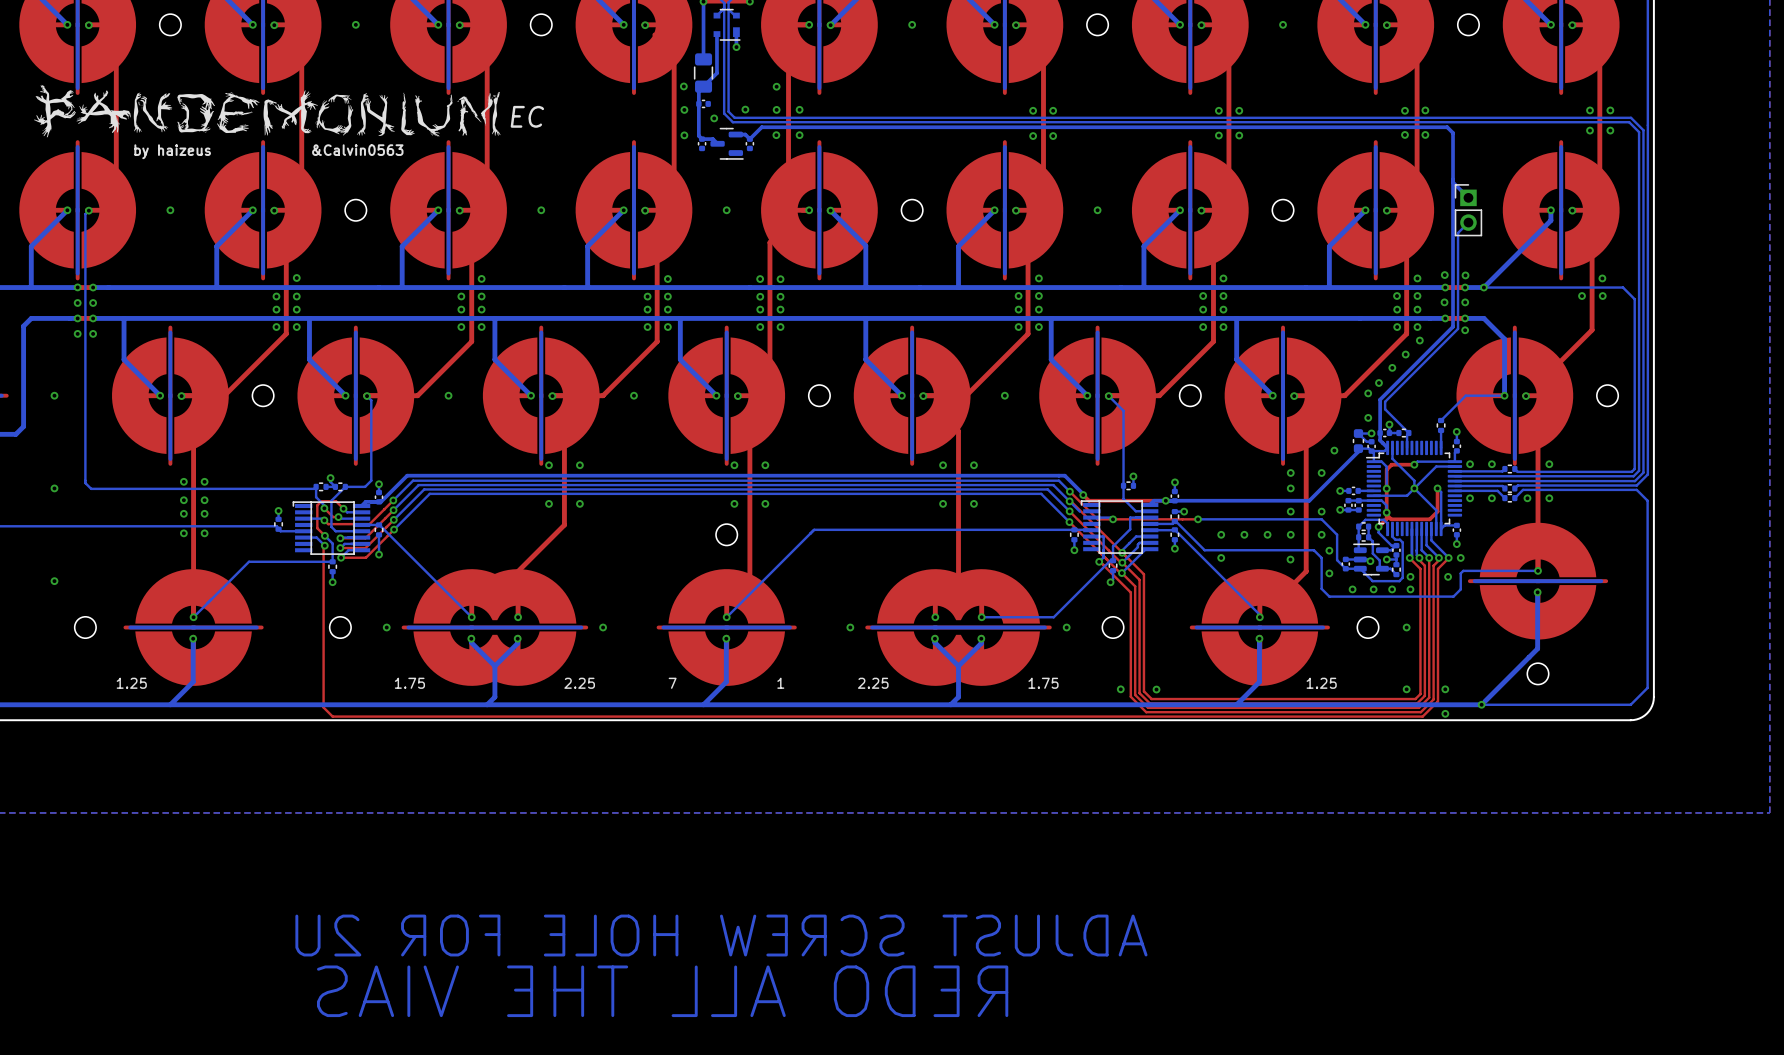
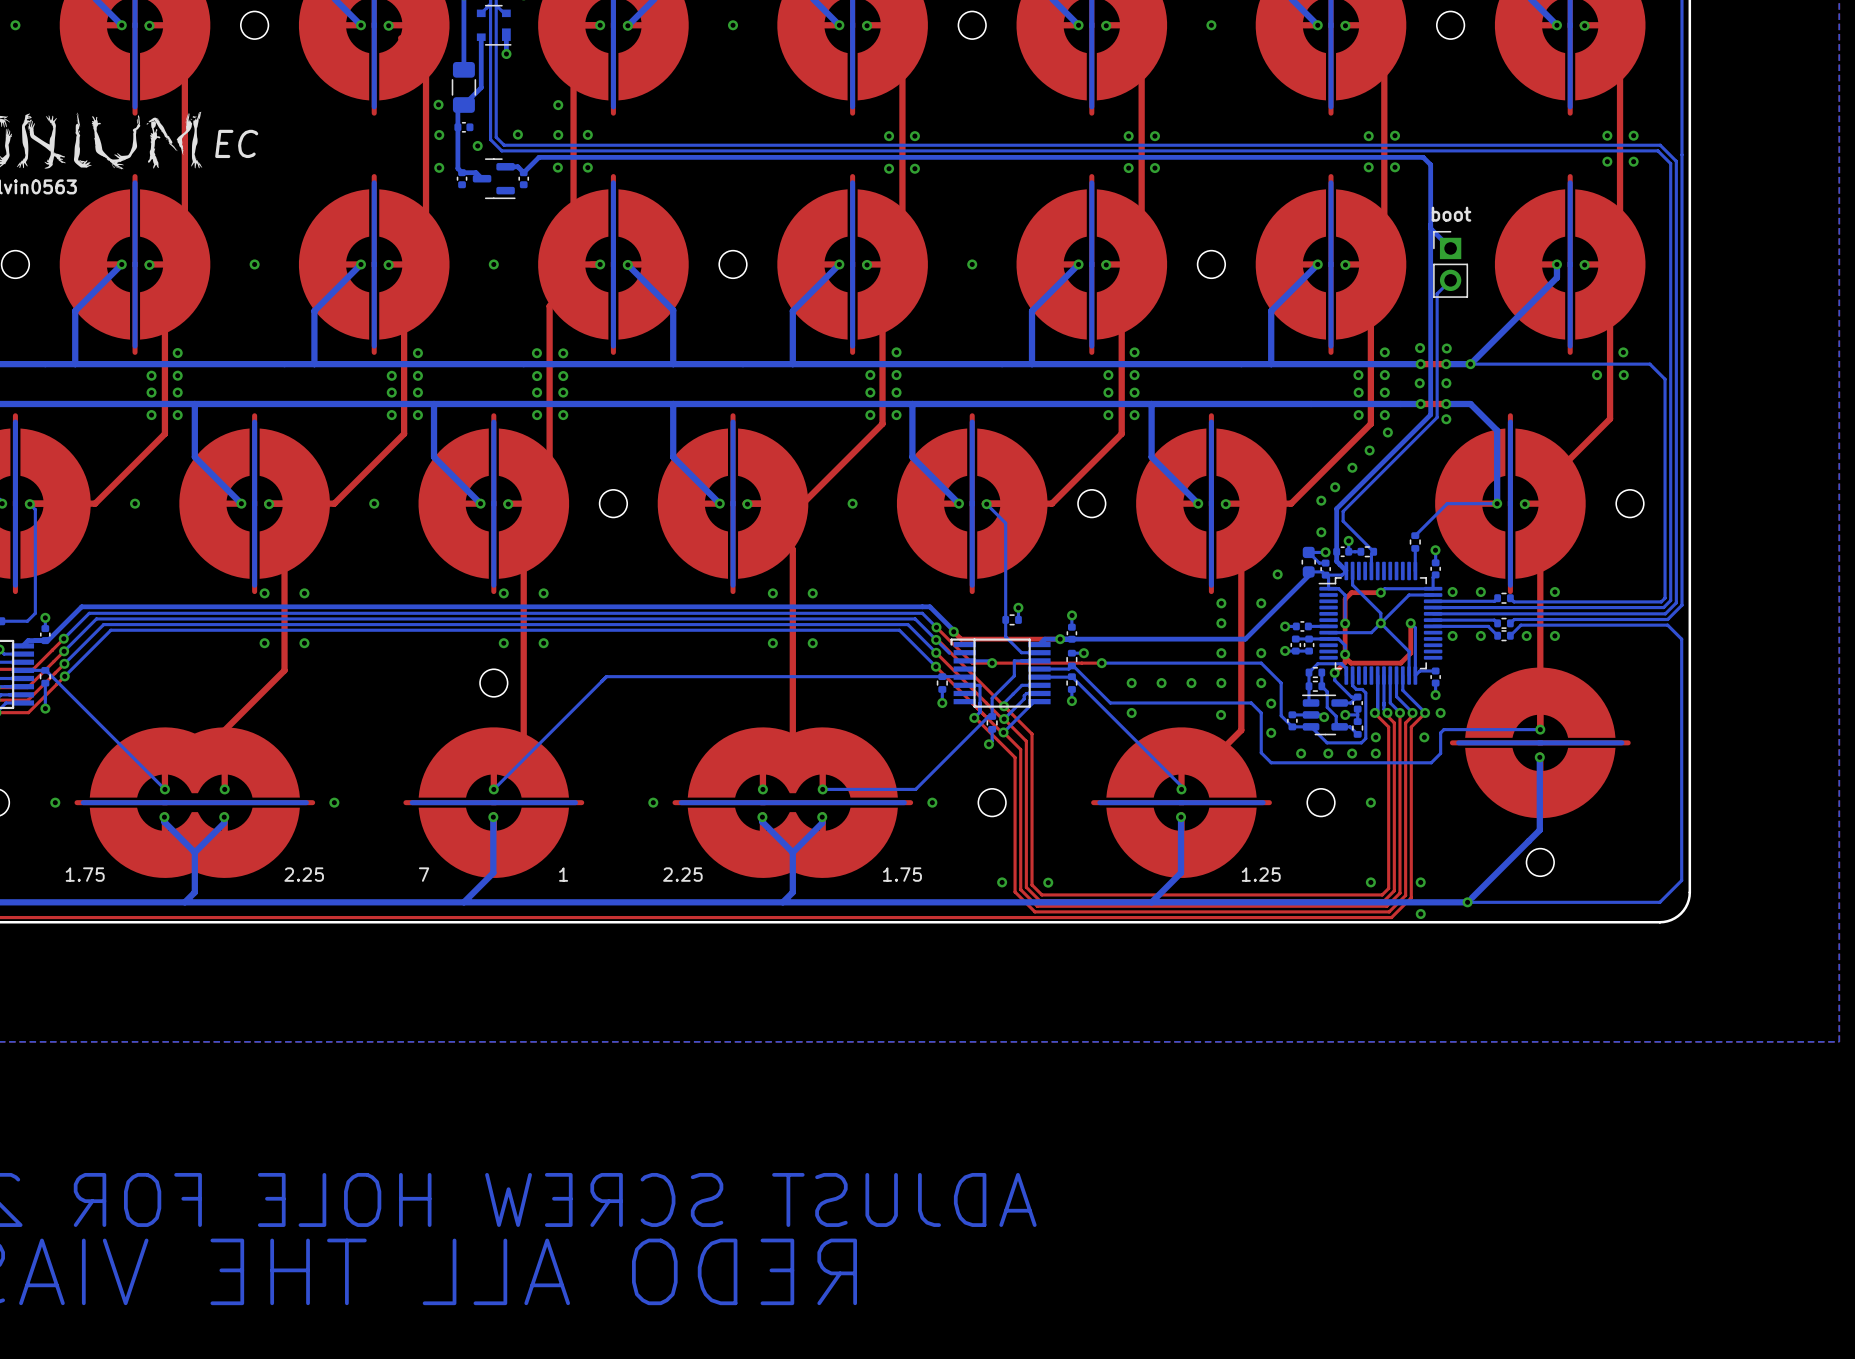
text: none -> boot (1451, 214)

